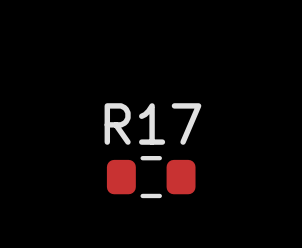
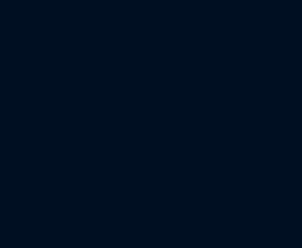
R17: (151, 177) -> none

